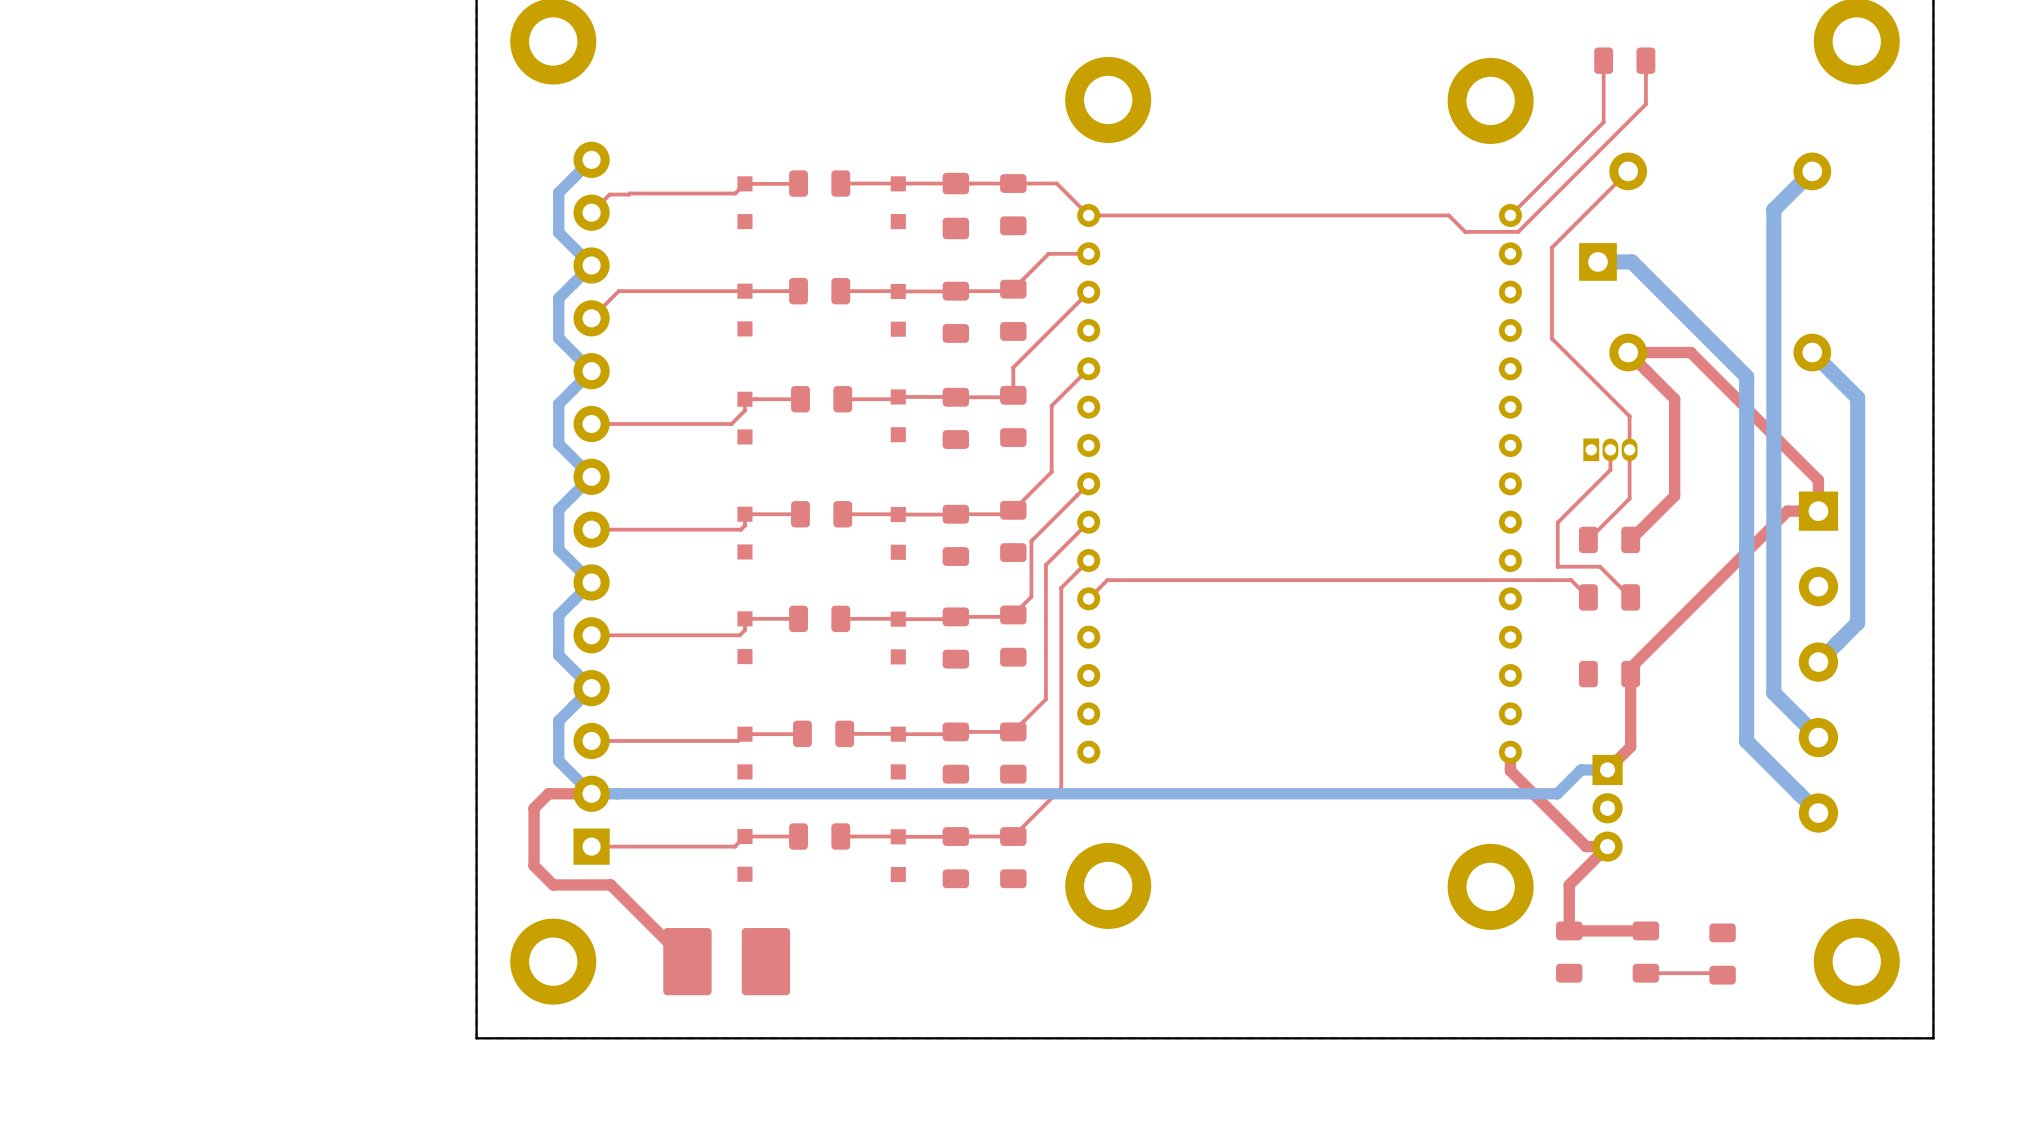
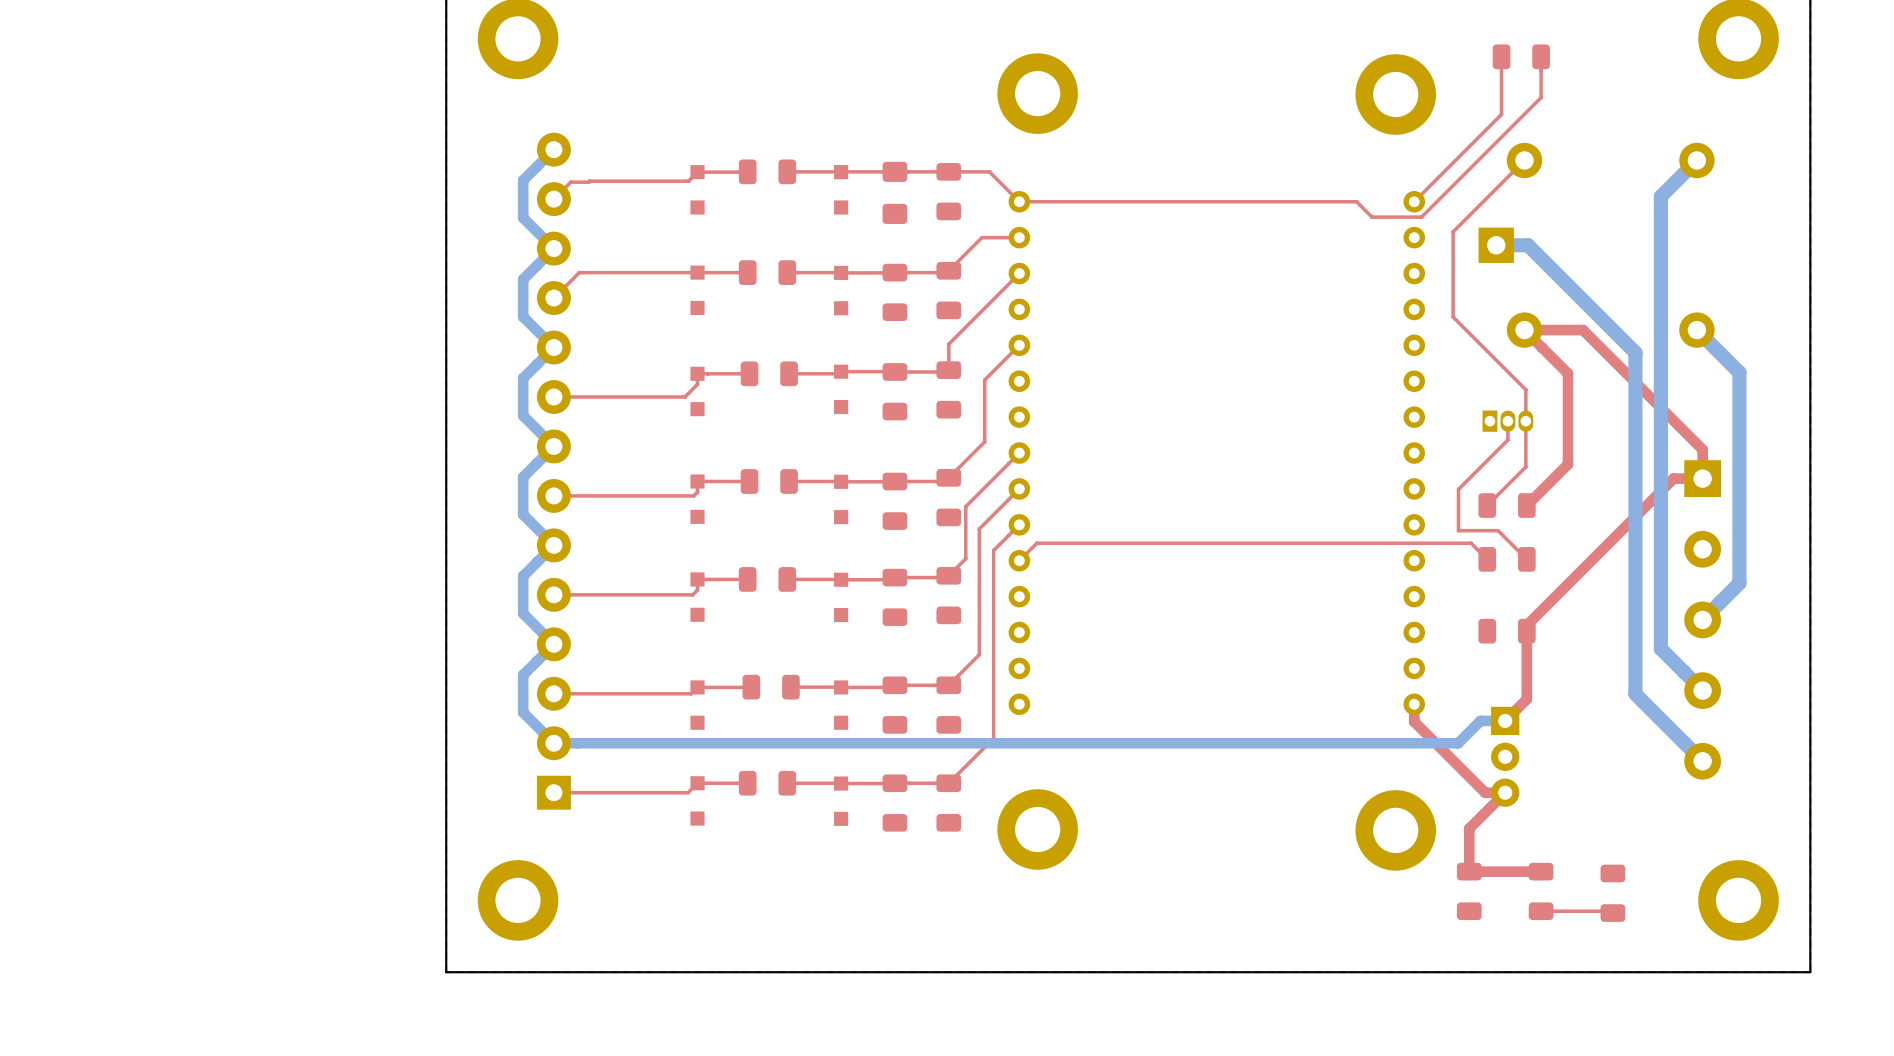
top track: (591, 793) (548, 793) (534, 808) (534, 865) (553, 884) (610, 884) (687, 961) -> none
part: (726, 961) -> none

